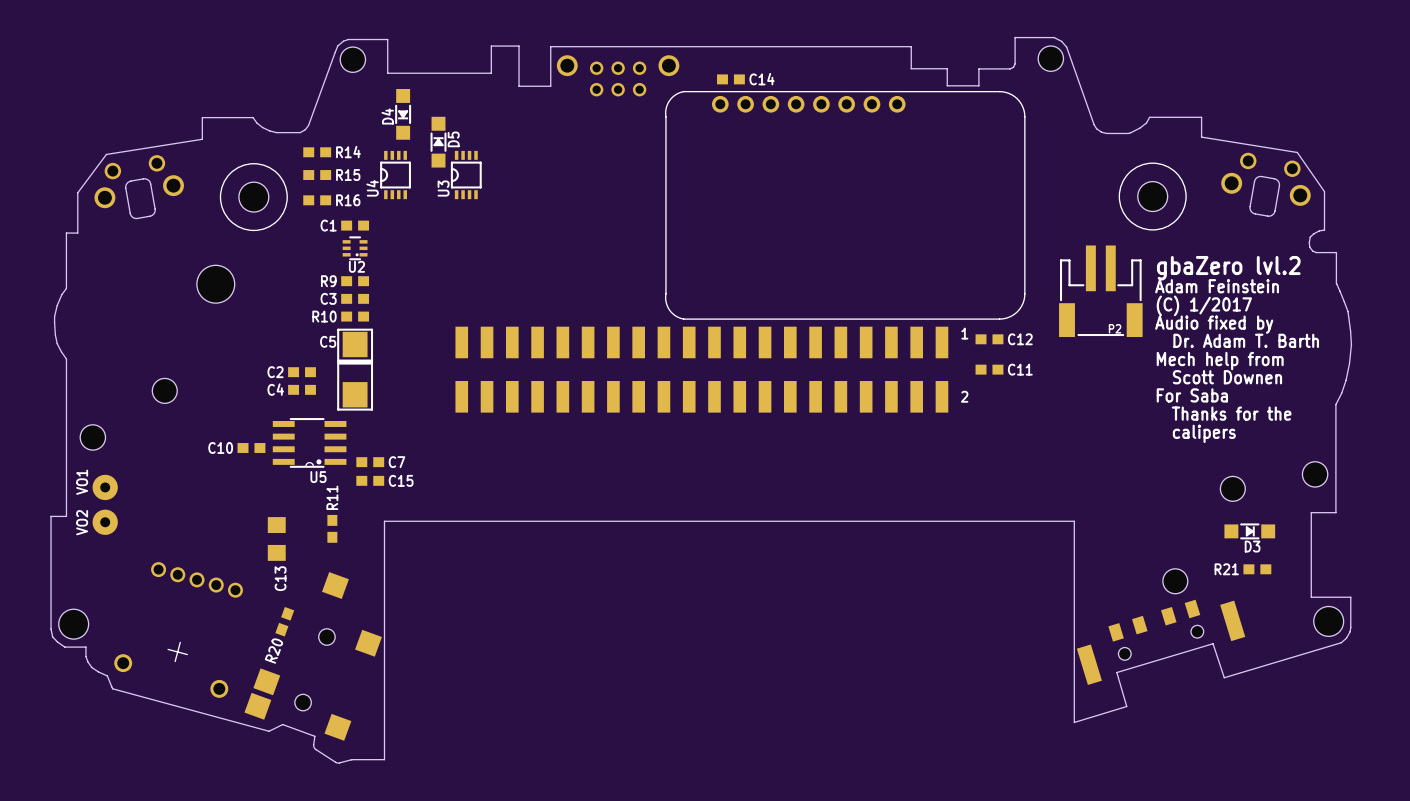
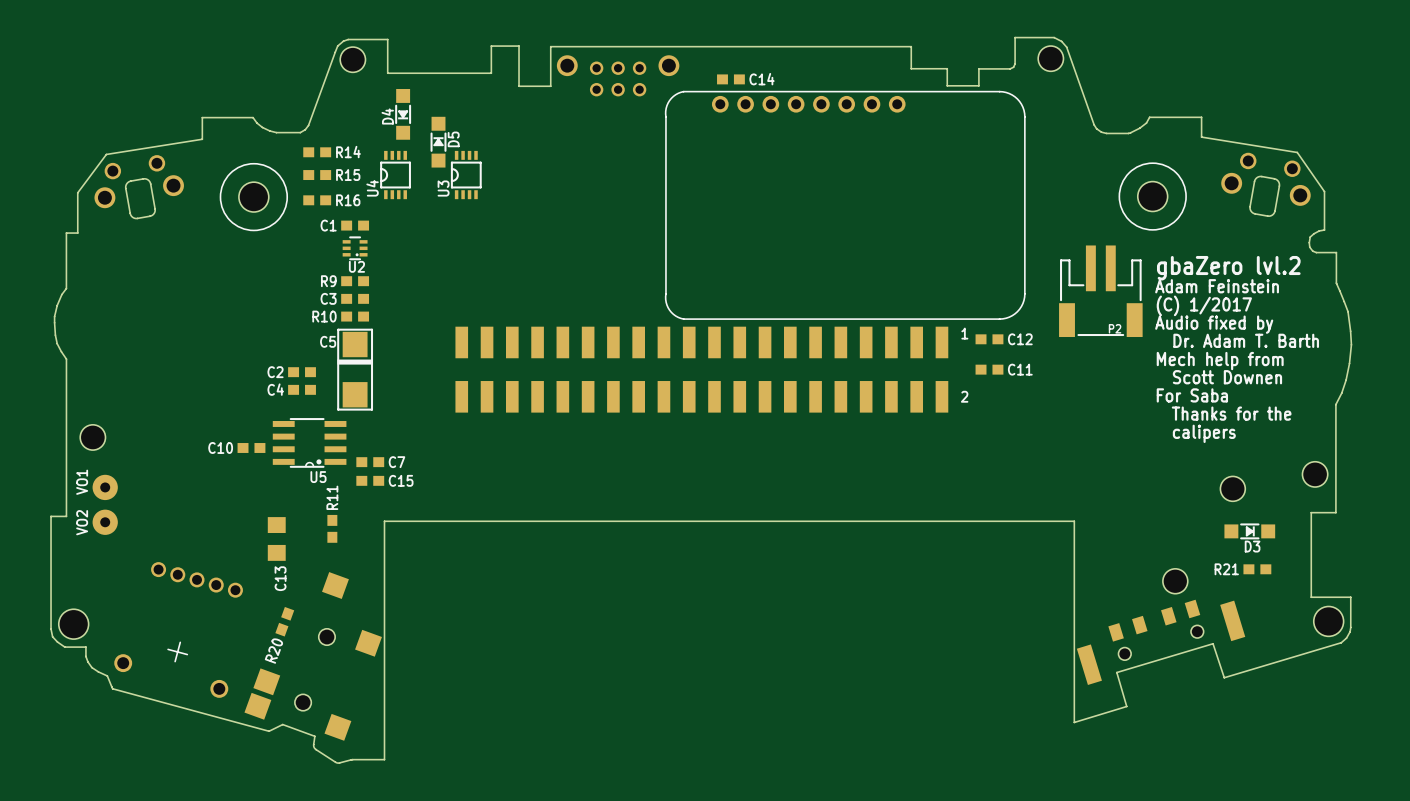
hole: (215, 284) -> none
hole: (164, 390) -> none

